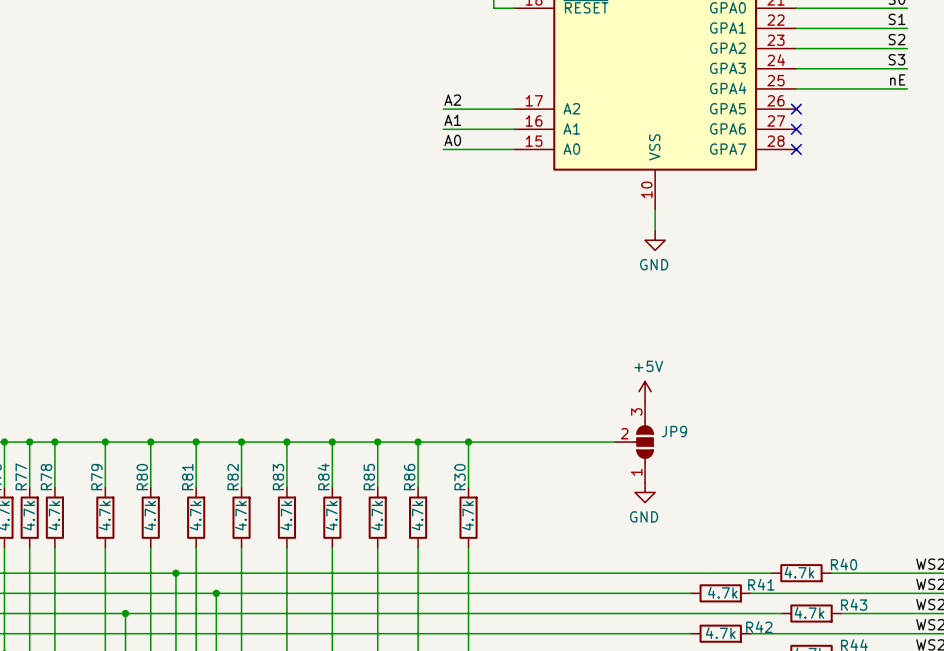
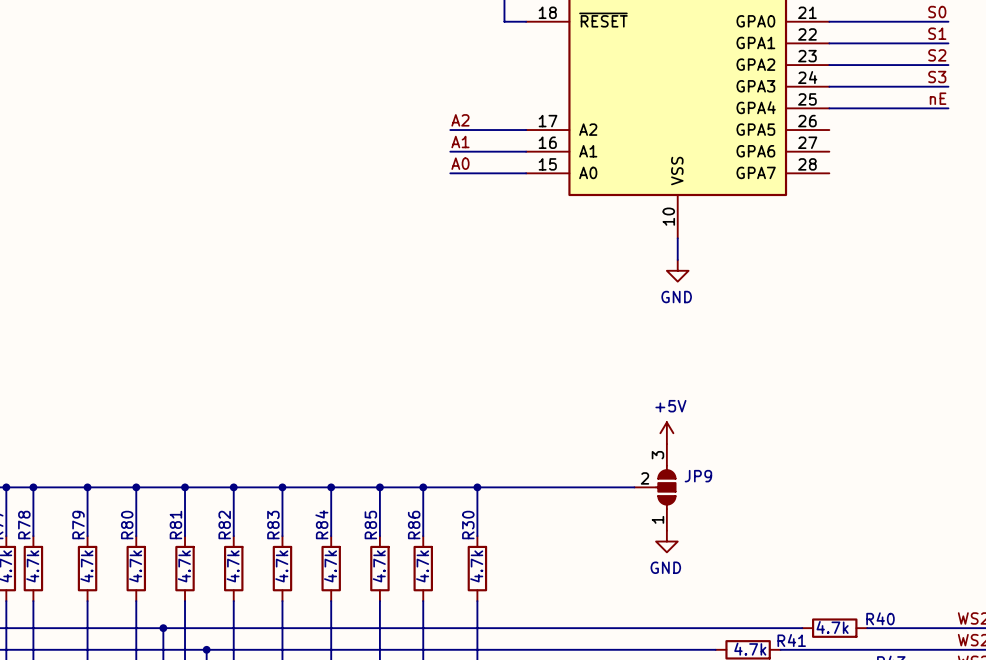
no-connect mark: (796, 109) -> none
no-connect mark: (796, 129) -> none
no-connect mark: (796, 149) -> none

